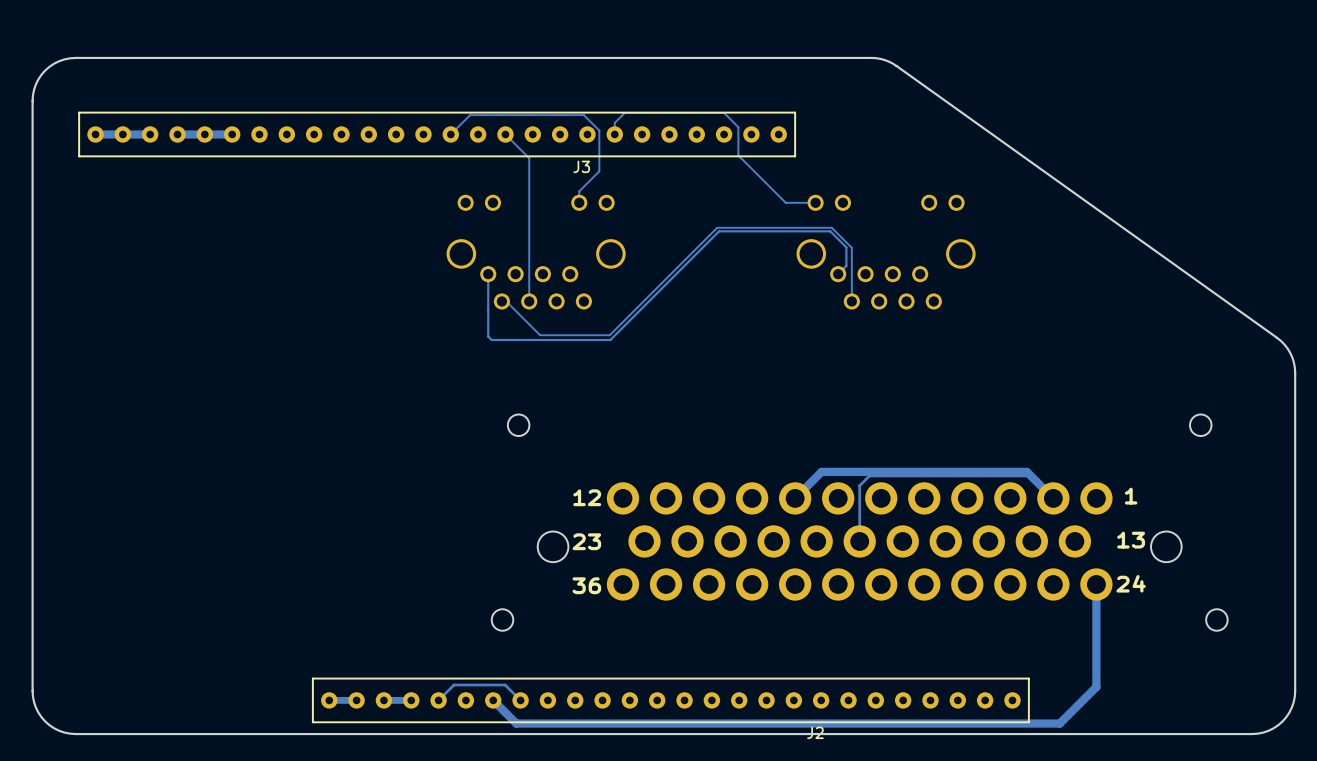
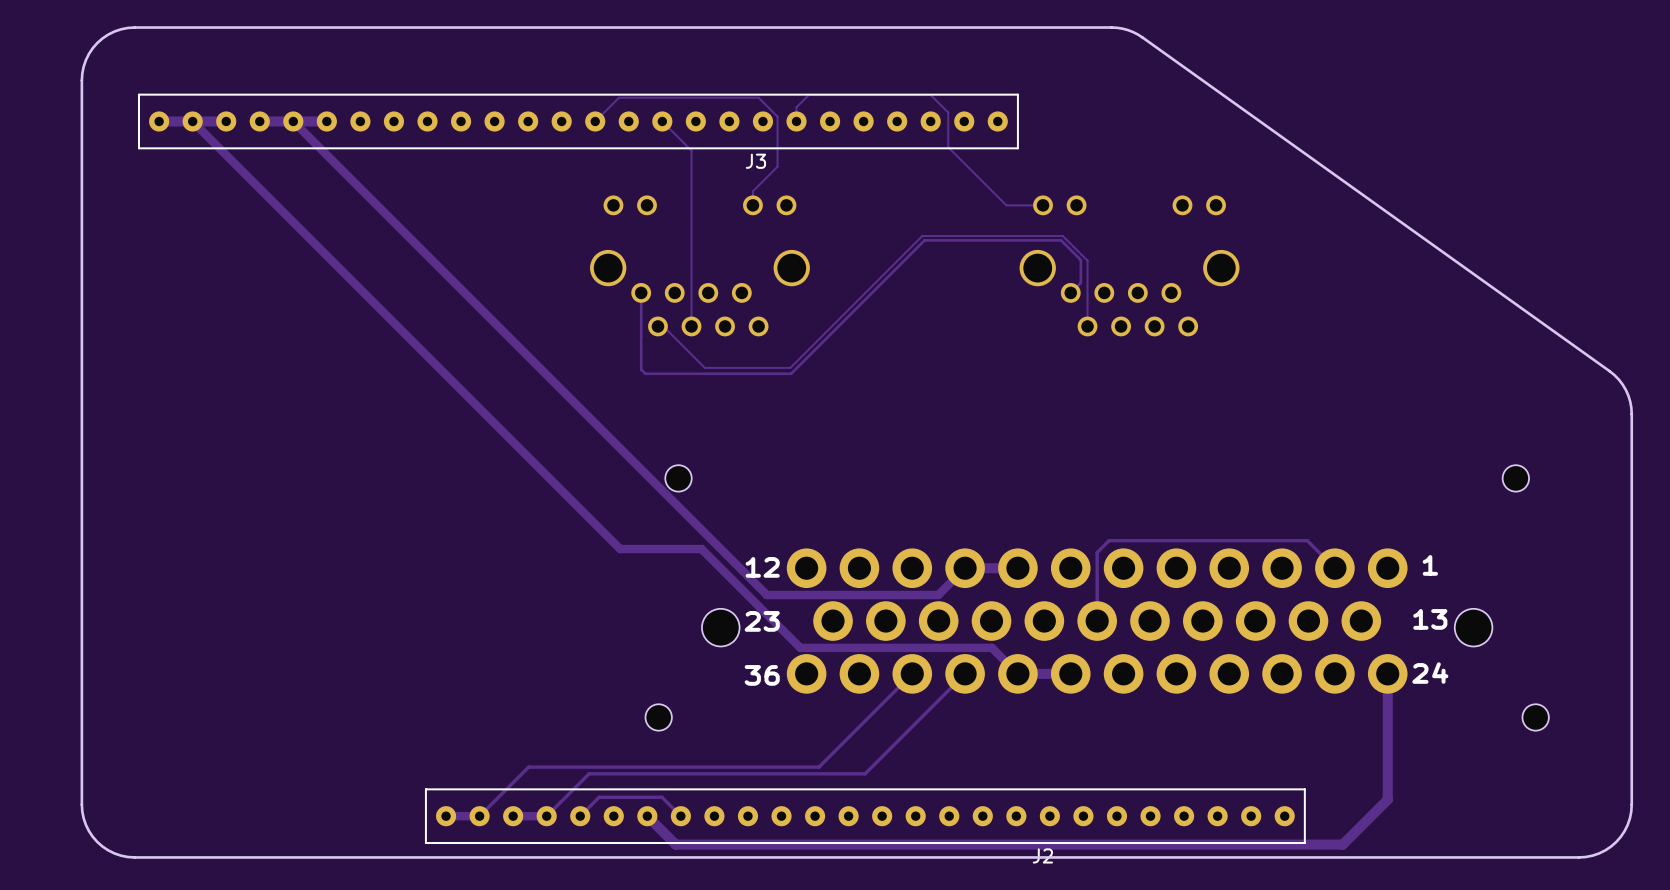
track: none -> (192, 121) (620, 549) (701, 549) (800, 647) (991, 647) (1017, 673) (1070, 673)
track: (1053, 498) (1026, 471) (821, 471) (795, 498) -> (293, 121) (766, 595) (938, 595) (965, 568) (1017, 568)
track: none -> (912, 673) (819, 767) (528, 767) (479, 816)
track: none -> (965, 673) (865, 773) (589, 773) (546, 816)

